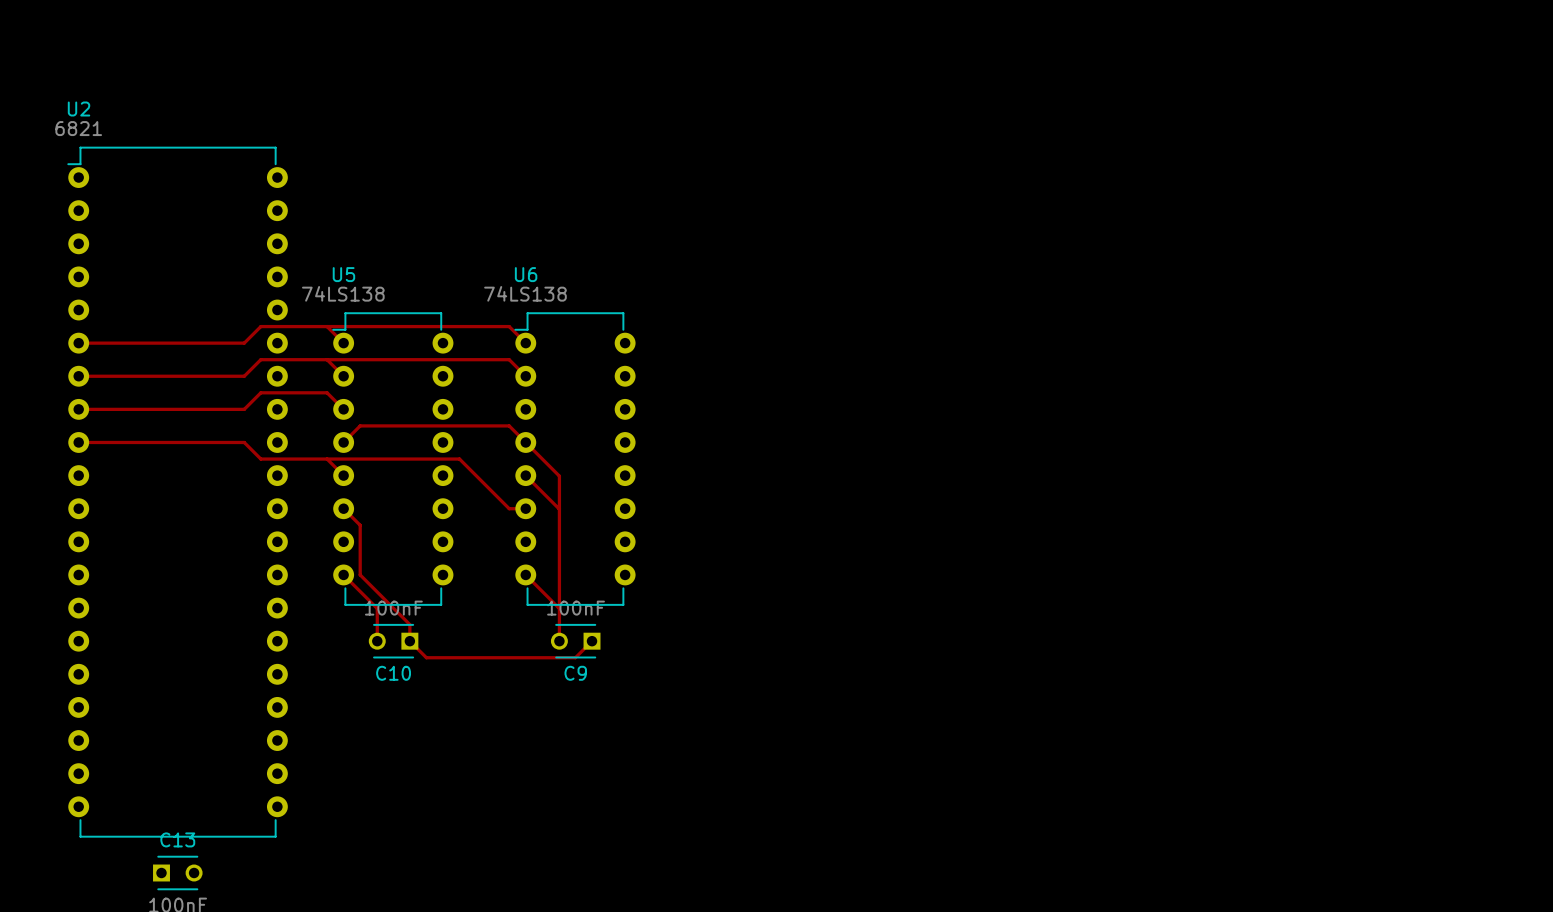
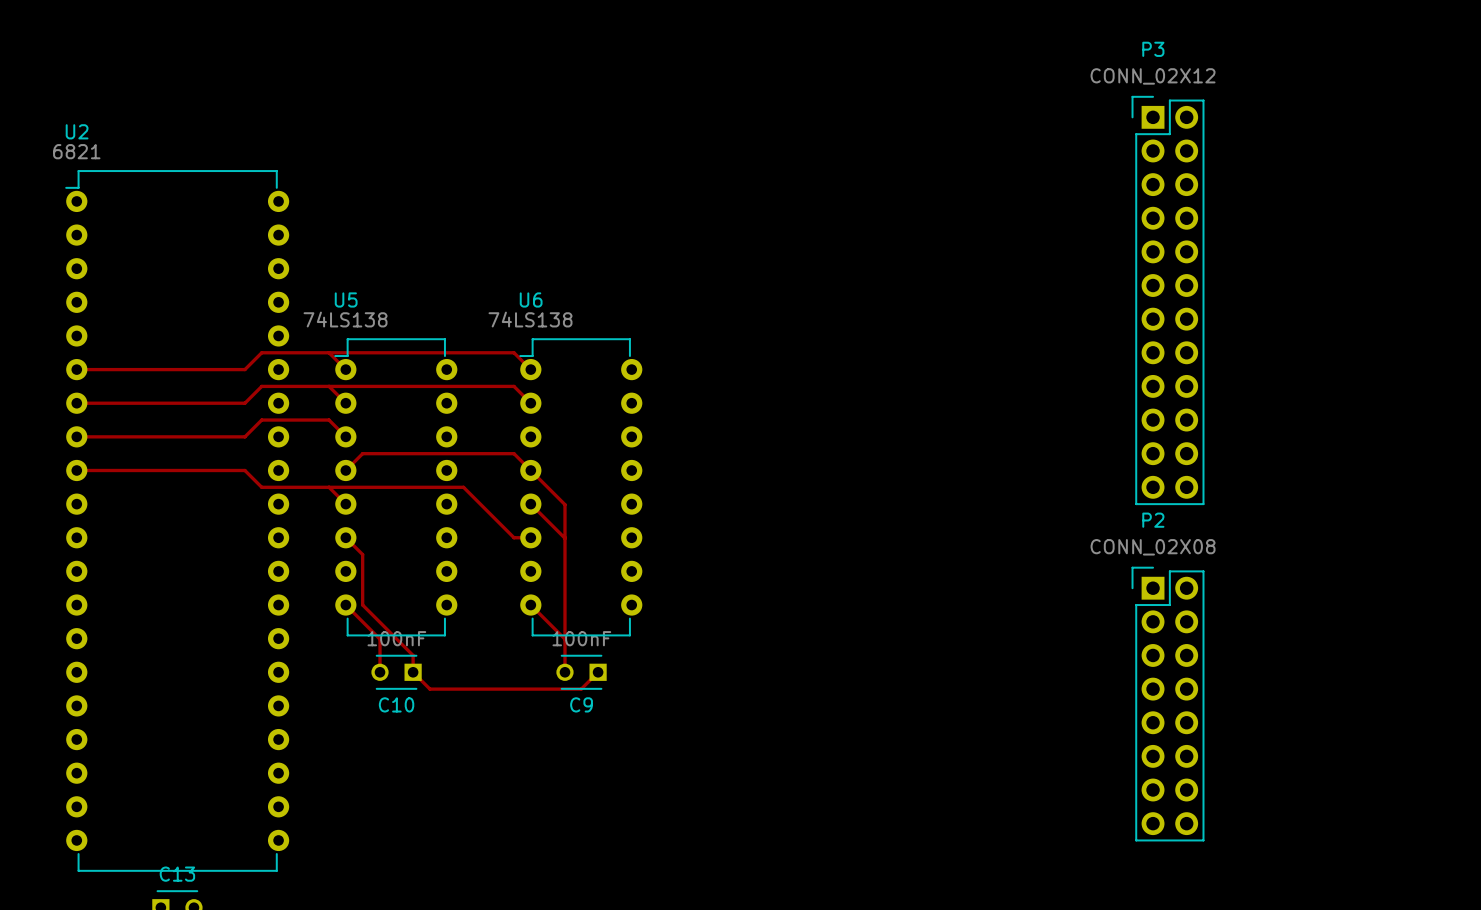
P3: none -> CONN_02X12 (1168, 300)
P2: none -> CONN_02X08 (1168, 704)

